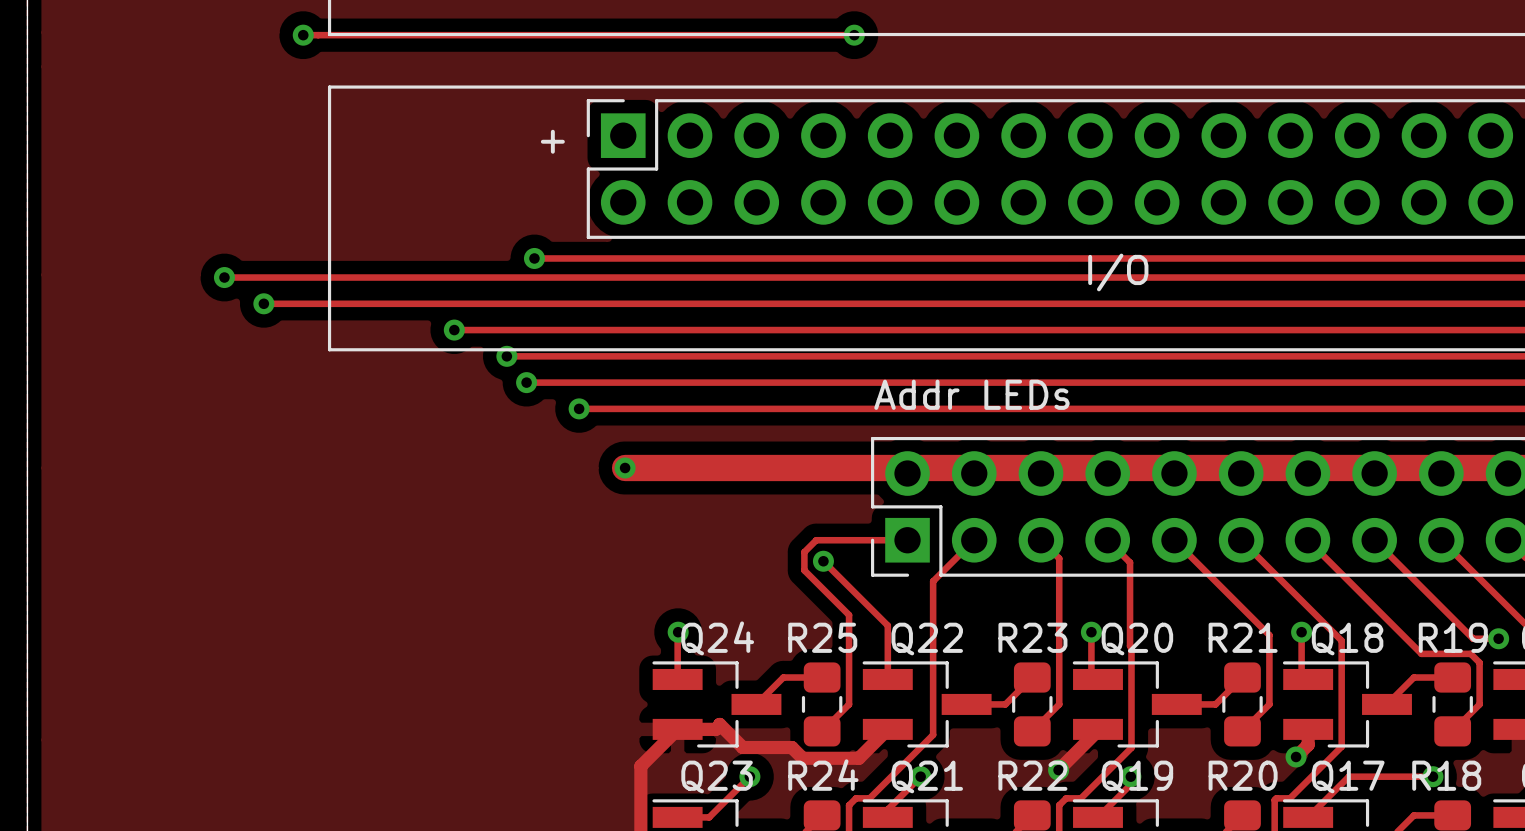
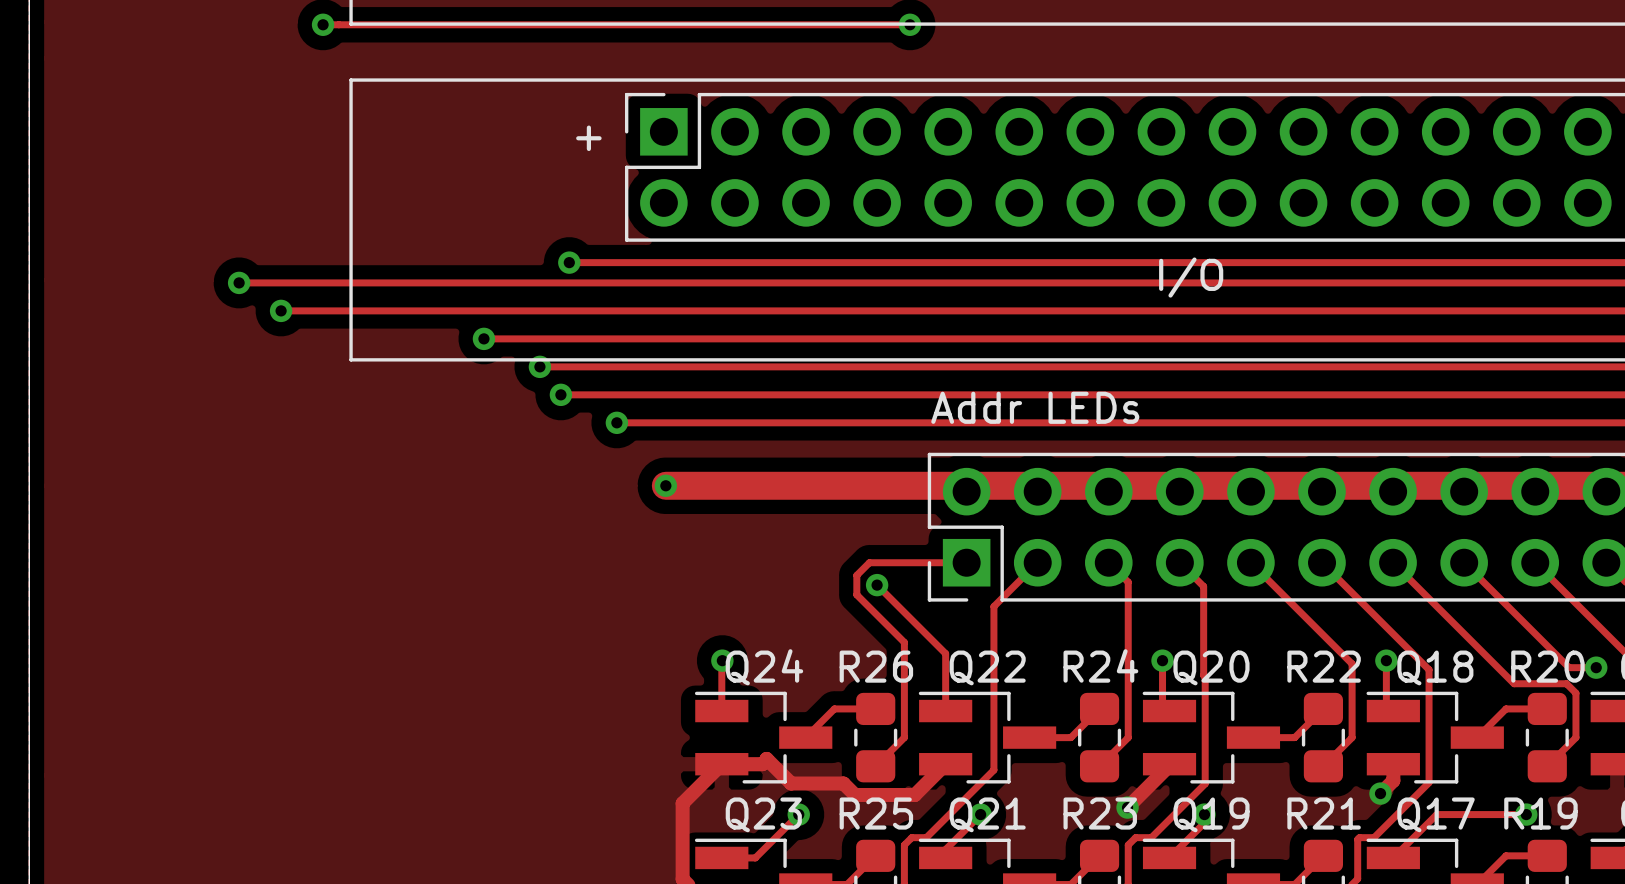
R25 name: R25 (822, 637) -> R26 (876, 666)
R23 name: R23 (1032, 637) -> R24 (1100, 665)
R21 name: R21 (1243, 637) -> R22 (1324, 666)
R19 name: R19 (1453, 637) -> R20 (1547, 666)
R24 name: R24 (823, 775) -> R25 (876, 813)
R22 name: R22 (1032, 775) -> R23 (1100, 813)
R20 name: R20 (1243, 775) -> R21 (1324, 813)
R18 name: R18 (1446, 775) -> R19 (1540, 813)

